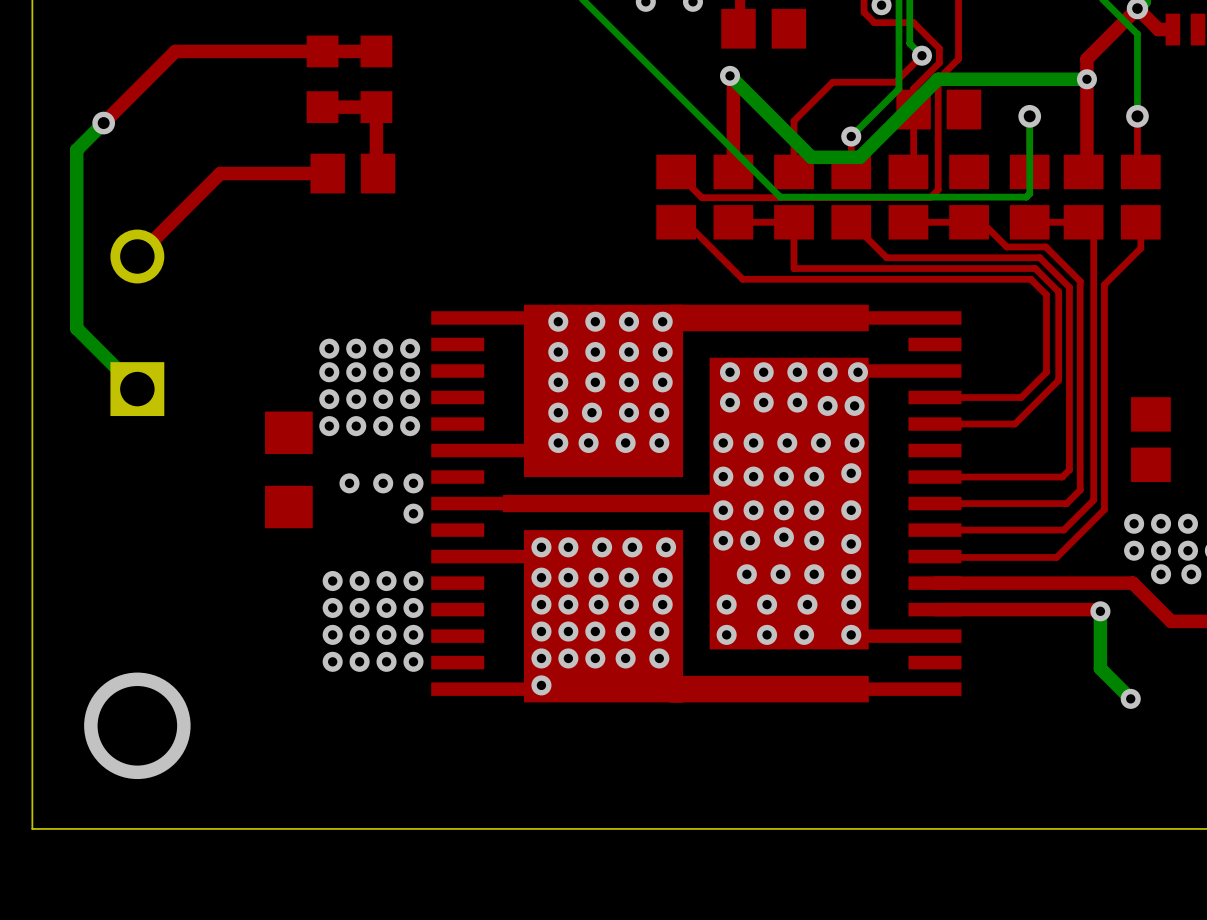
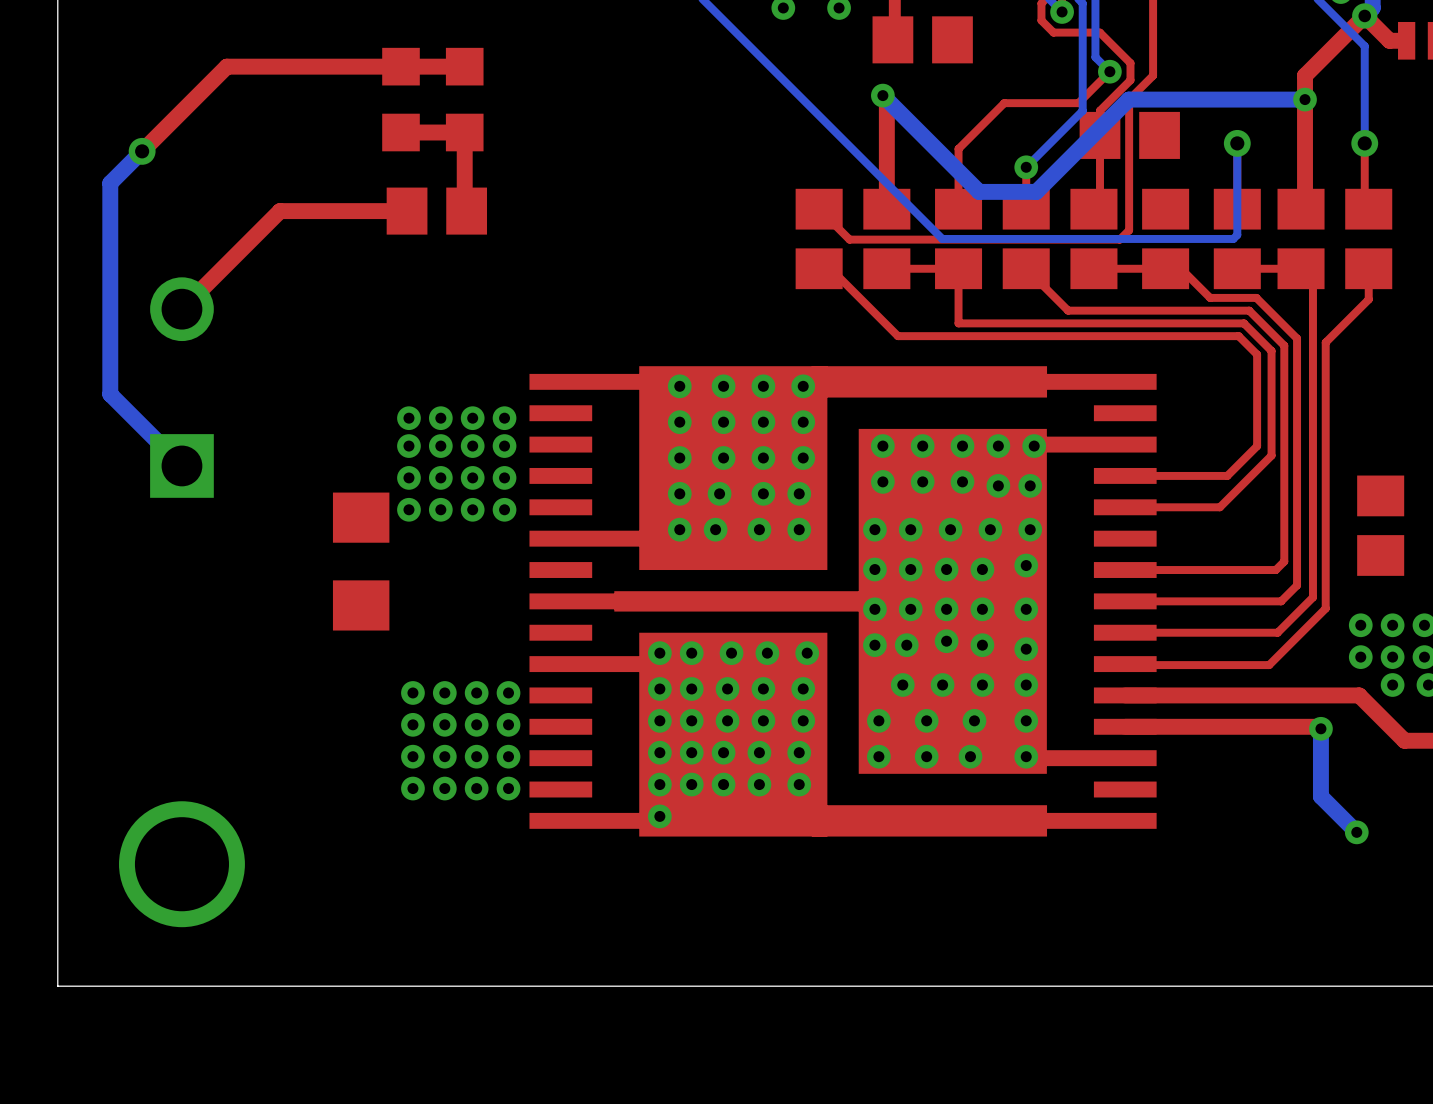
via: (349, 483) -> none
via: (383, 483) -> none
via: (413, 483) -> none
via: (413, 513) -> none

